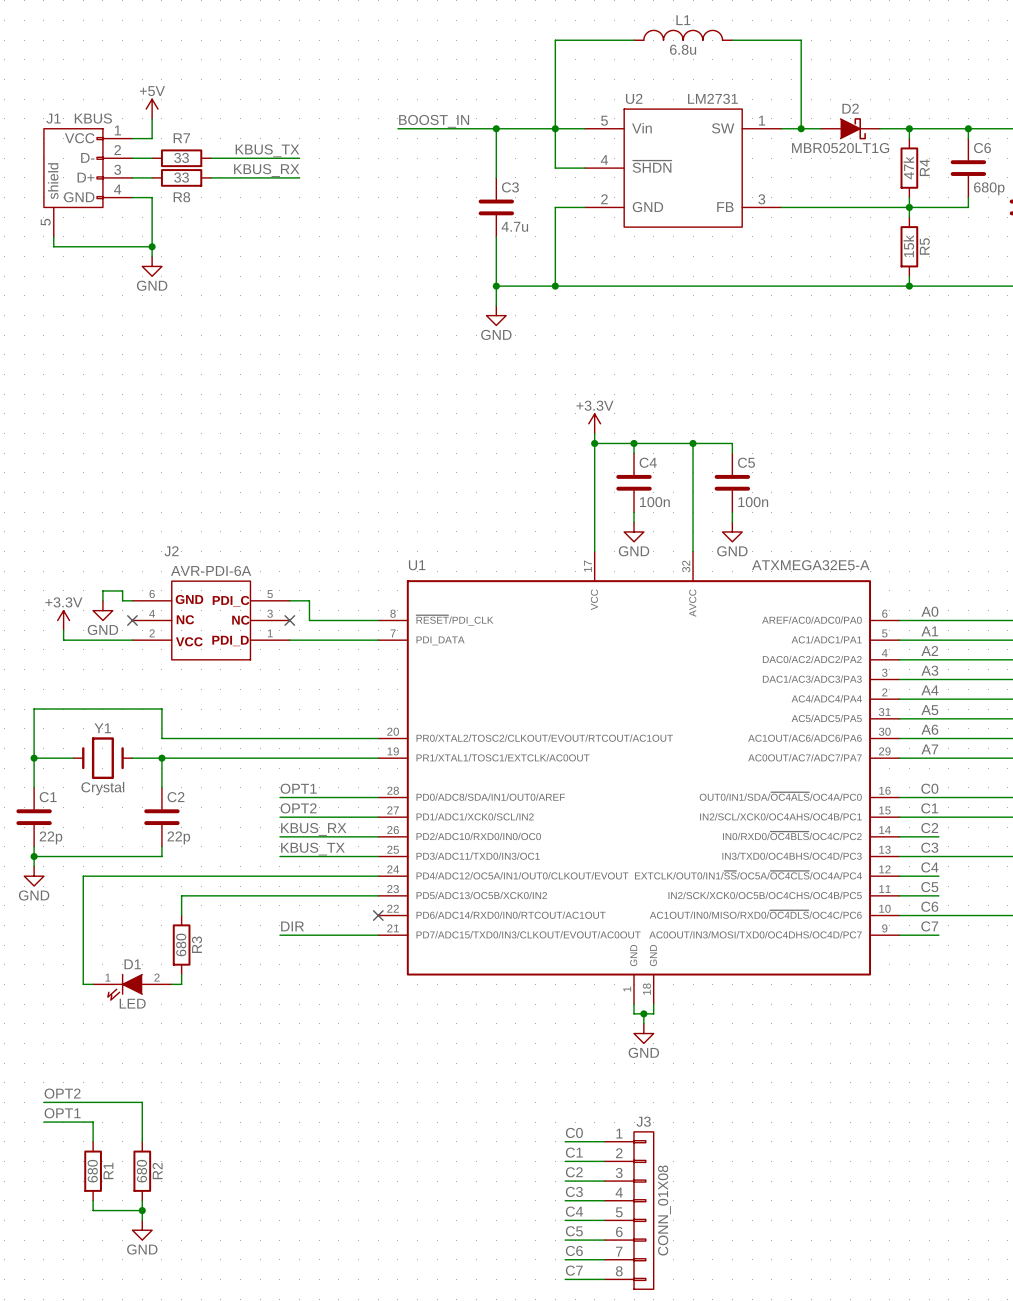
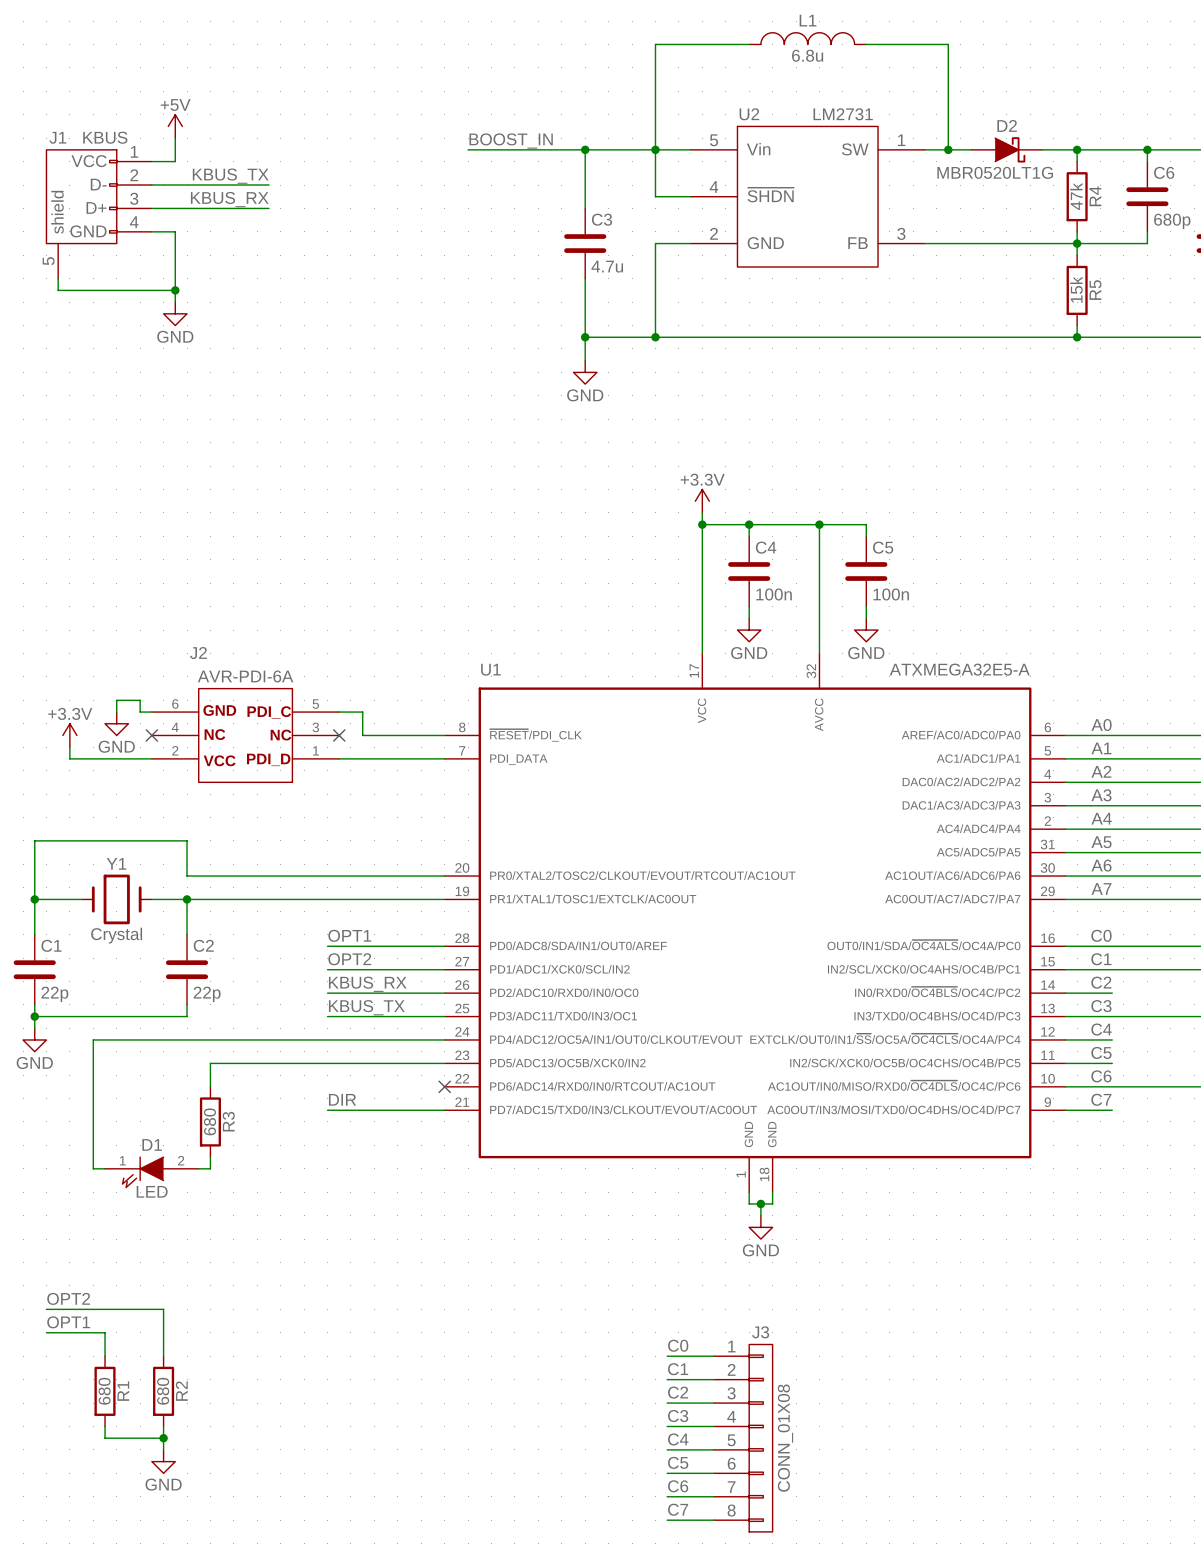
label position: KBUS_TX (267, 150) -> KBUS_TX (230, 176)
wire: none -> (175, 185) (245, 185)
R7: 33 (181, 158) -> none
wire: (230, 158) (299, 158) -> none
label position: KBUS_RX (266, 170) -> KBUS_RX (229, 199)
wire: none -> (175, 208) (245, 208)
R8: 33 (181, 177) -> none
wire: (230, 177) (299, 177) -> none

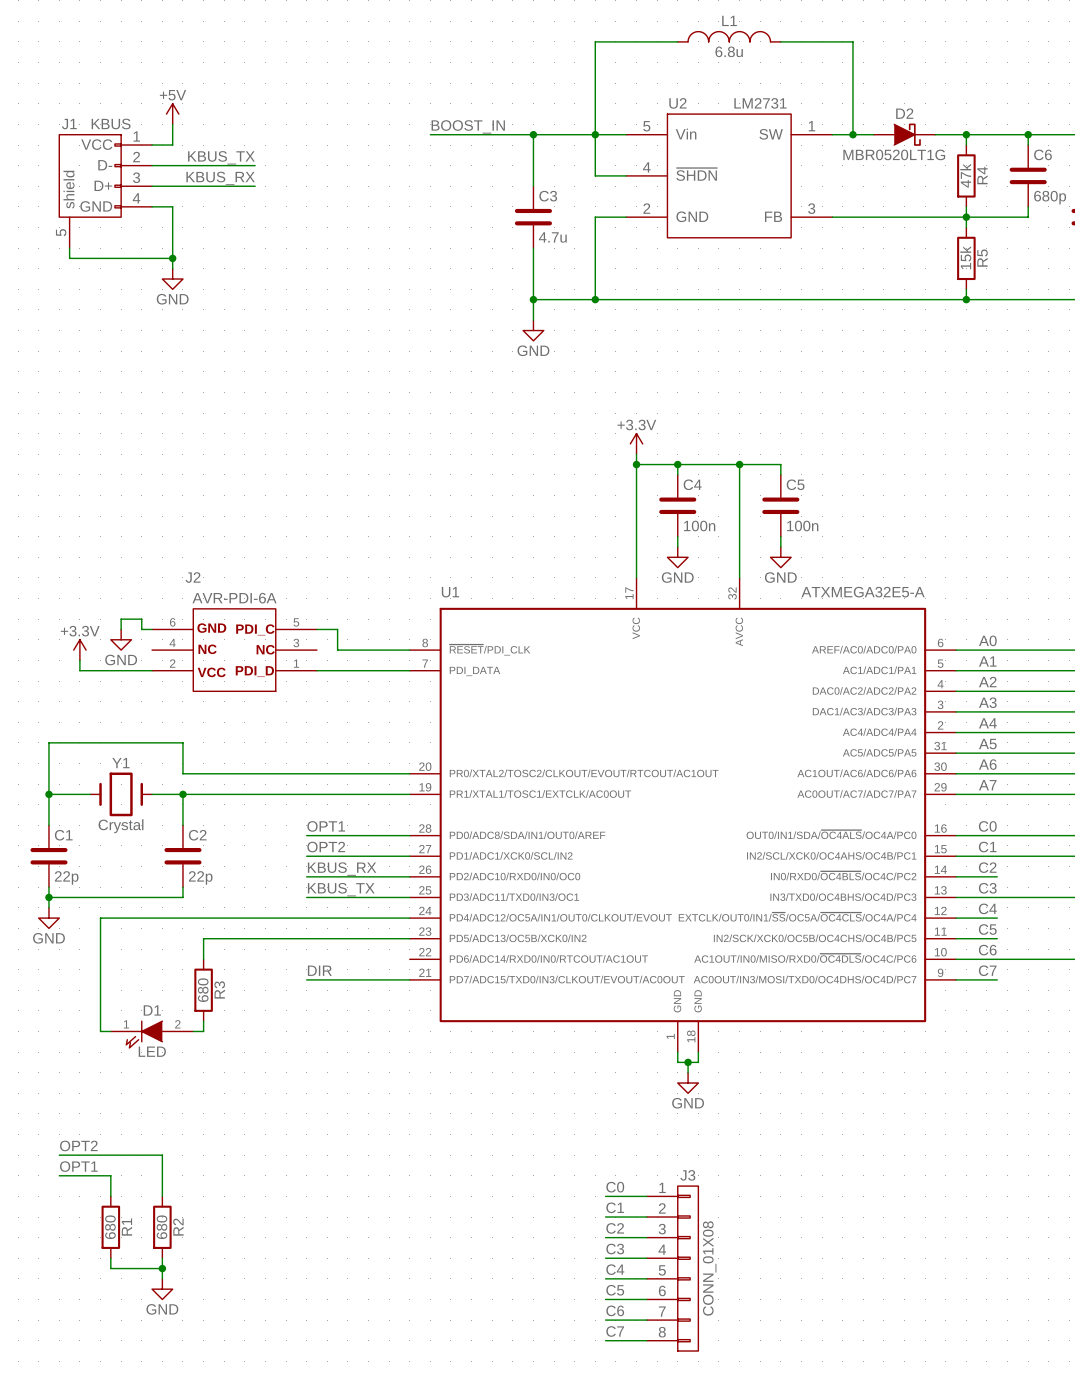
no-connect mark: (151, 735) -> none
no-connect mark: (339, 735) -> none
no-connect mark: (444, 1086) -> none

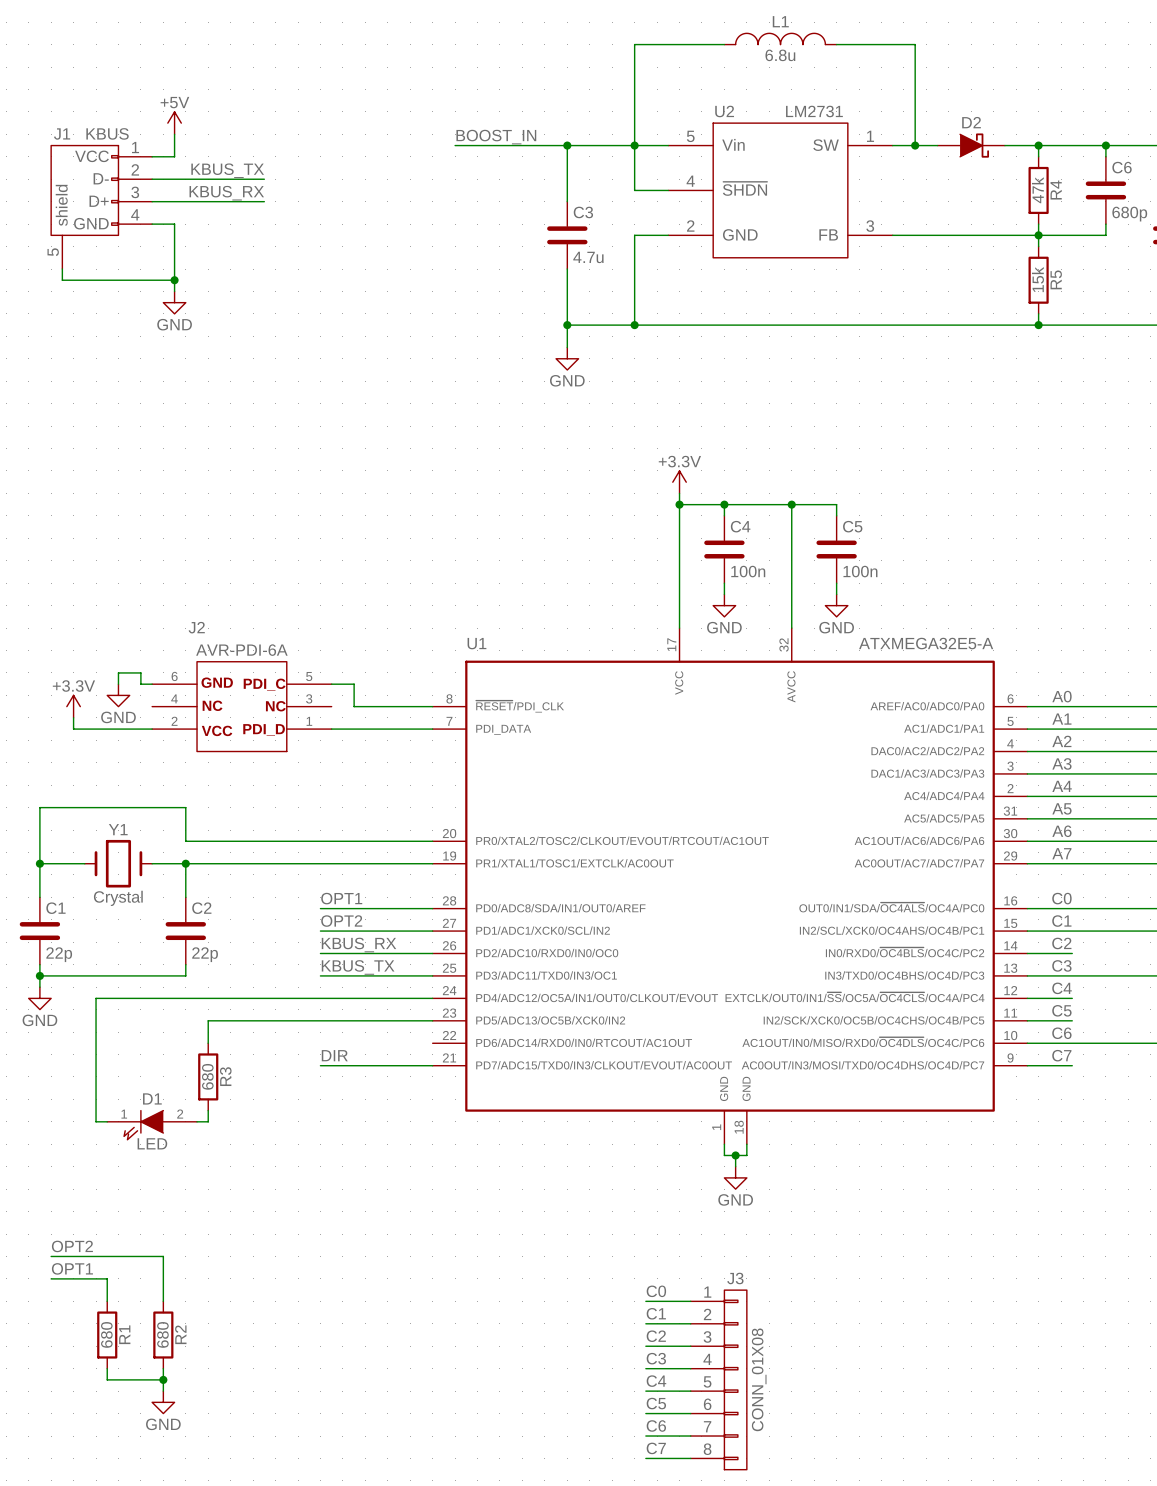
D2 value: MBR0520LT1G (894, 154) -> none

